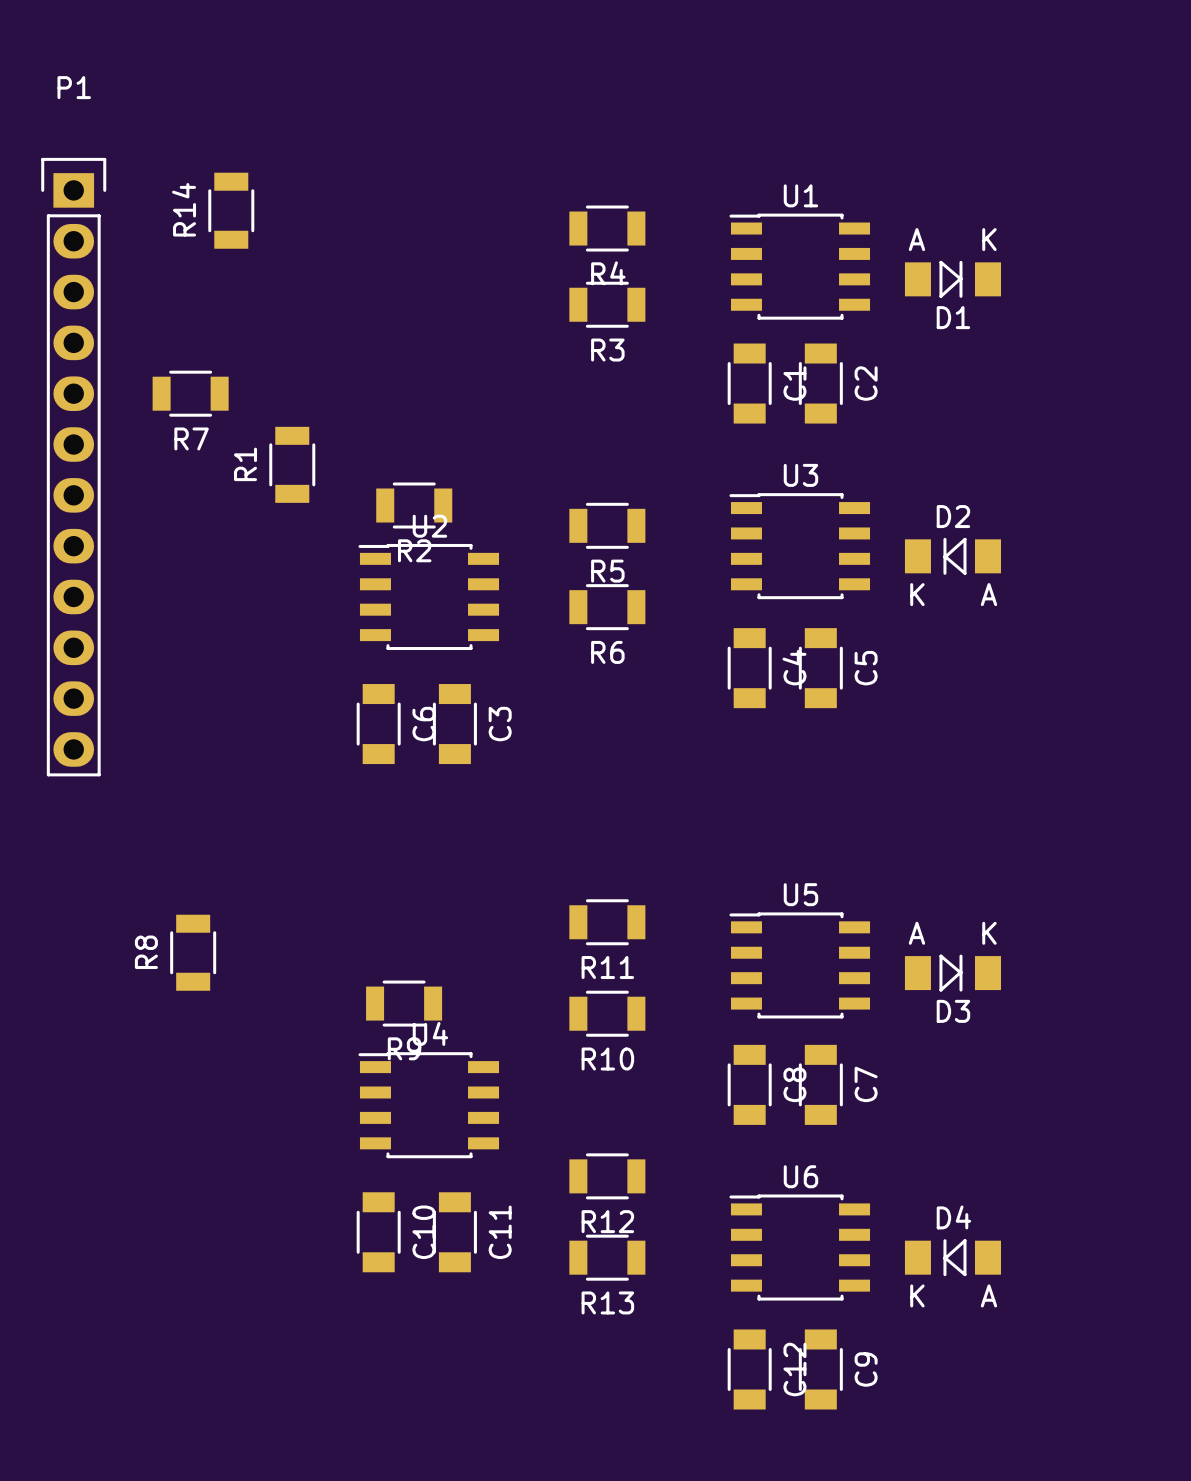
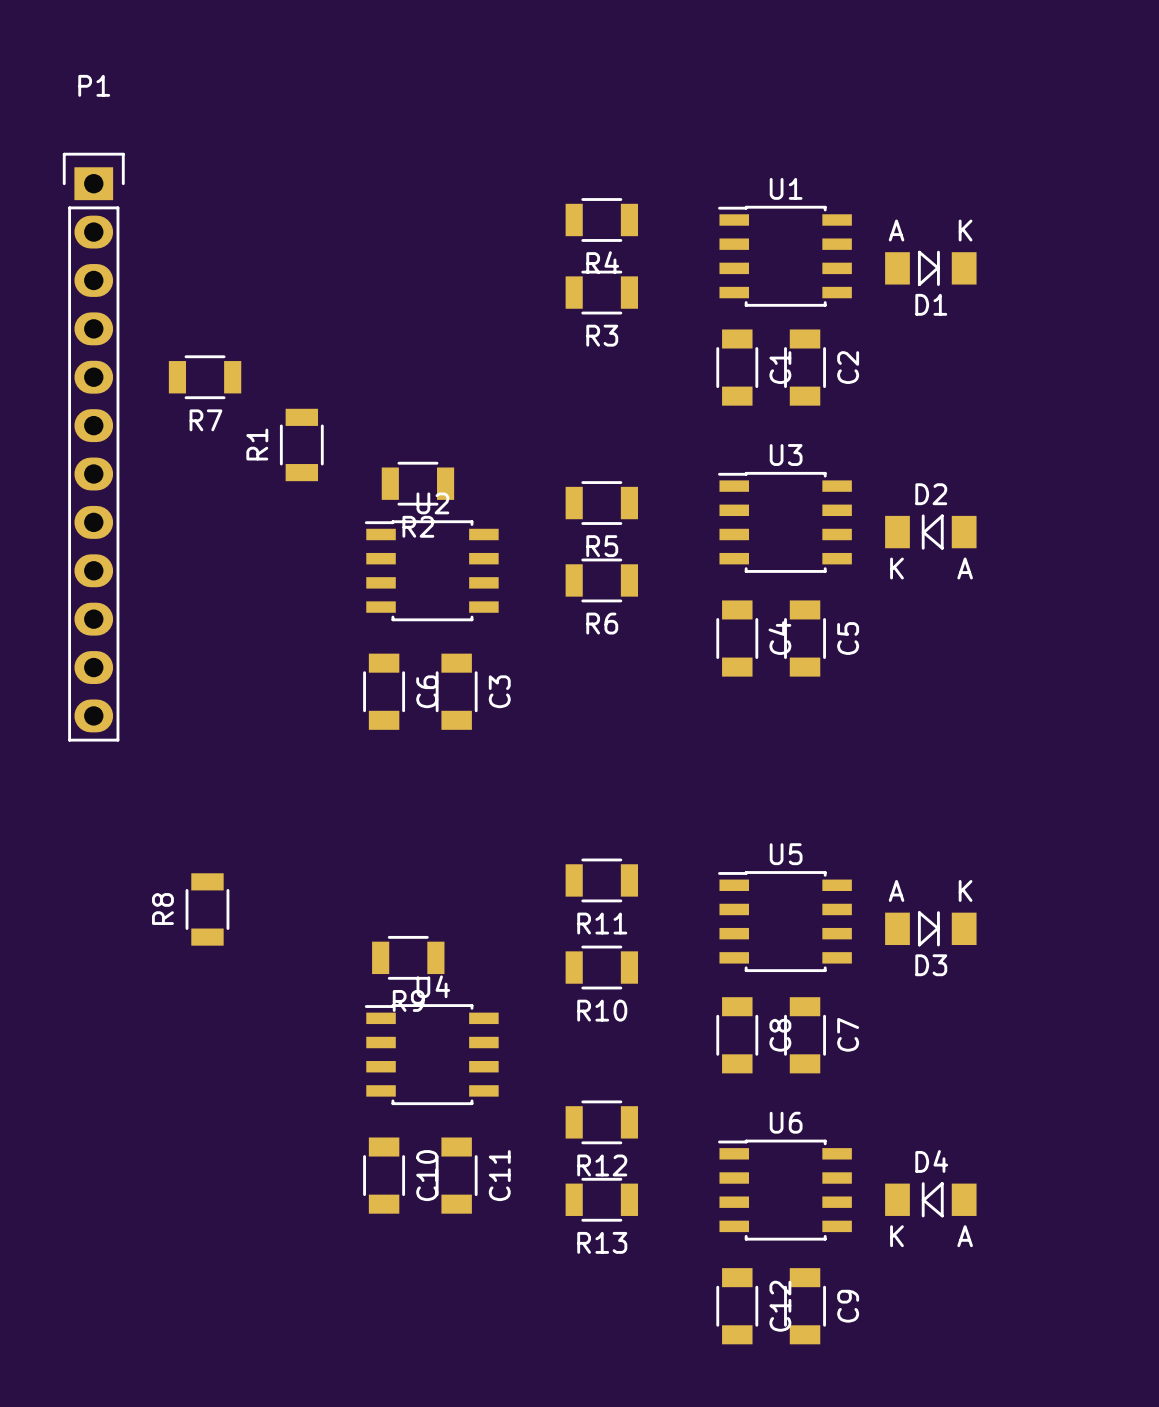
R14: (231, 210) -> none

